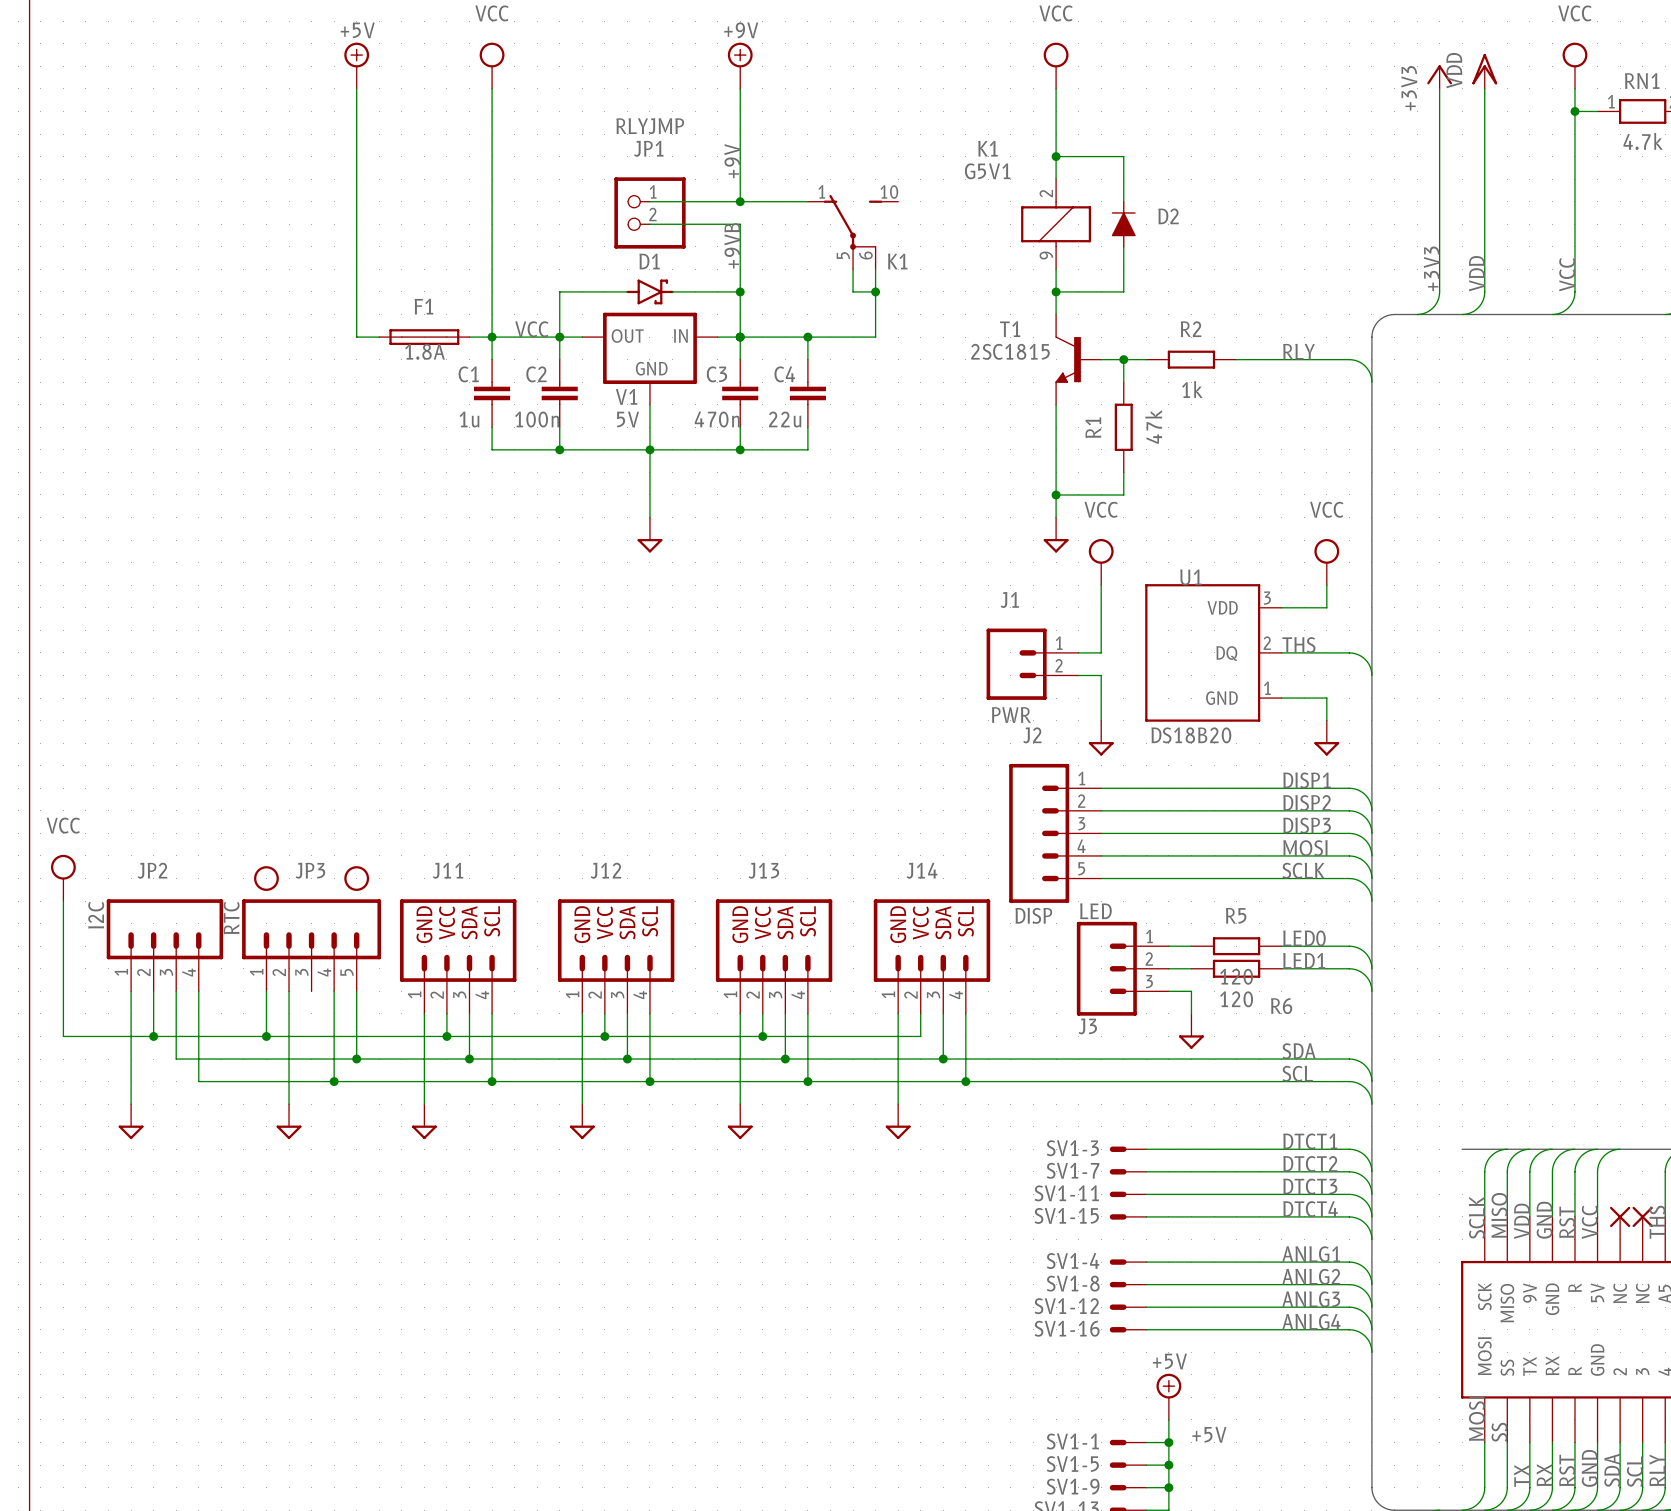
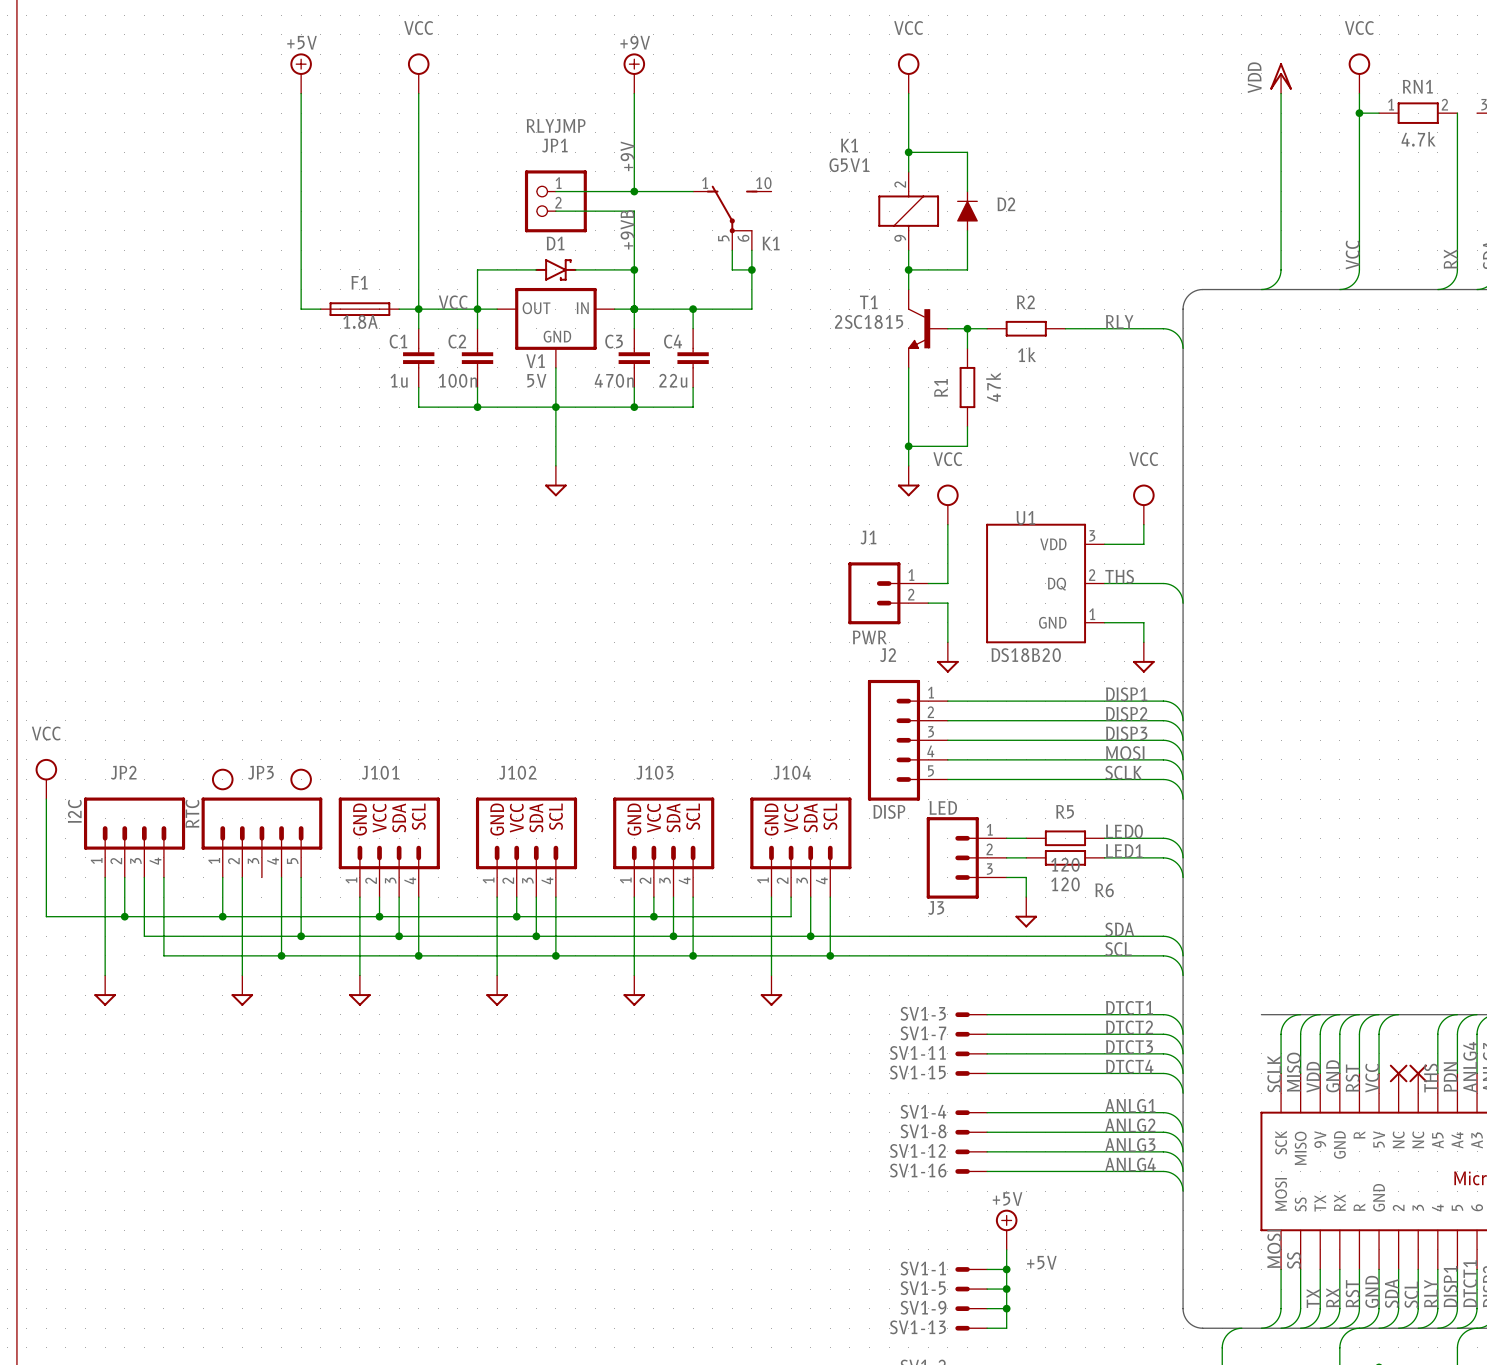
power symbol: +3V3 (1439, 77) -> none
wire: (1439, 88) (1439, 294) (1436, 303) (1430, 309) (1417, 314) -> none
label: +3V3 (1431, 268) -> none
label: VDD (1476, 273) -> none
J11 name: J11 (448, 870) -> J101 (380, 772)
J12 name: J12 (605, 870) -> J102 (517, 772)
J13 name: J13 (763, 870) -> J103 (654, 772)
J14 name: J14 (922, 870) -> J104 (792, 772)

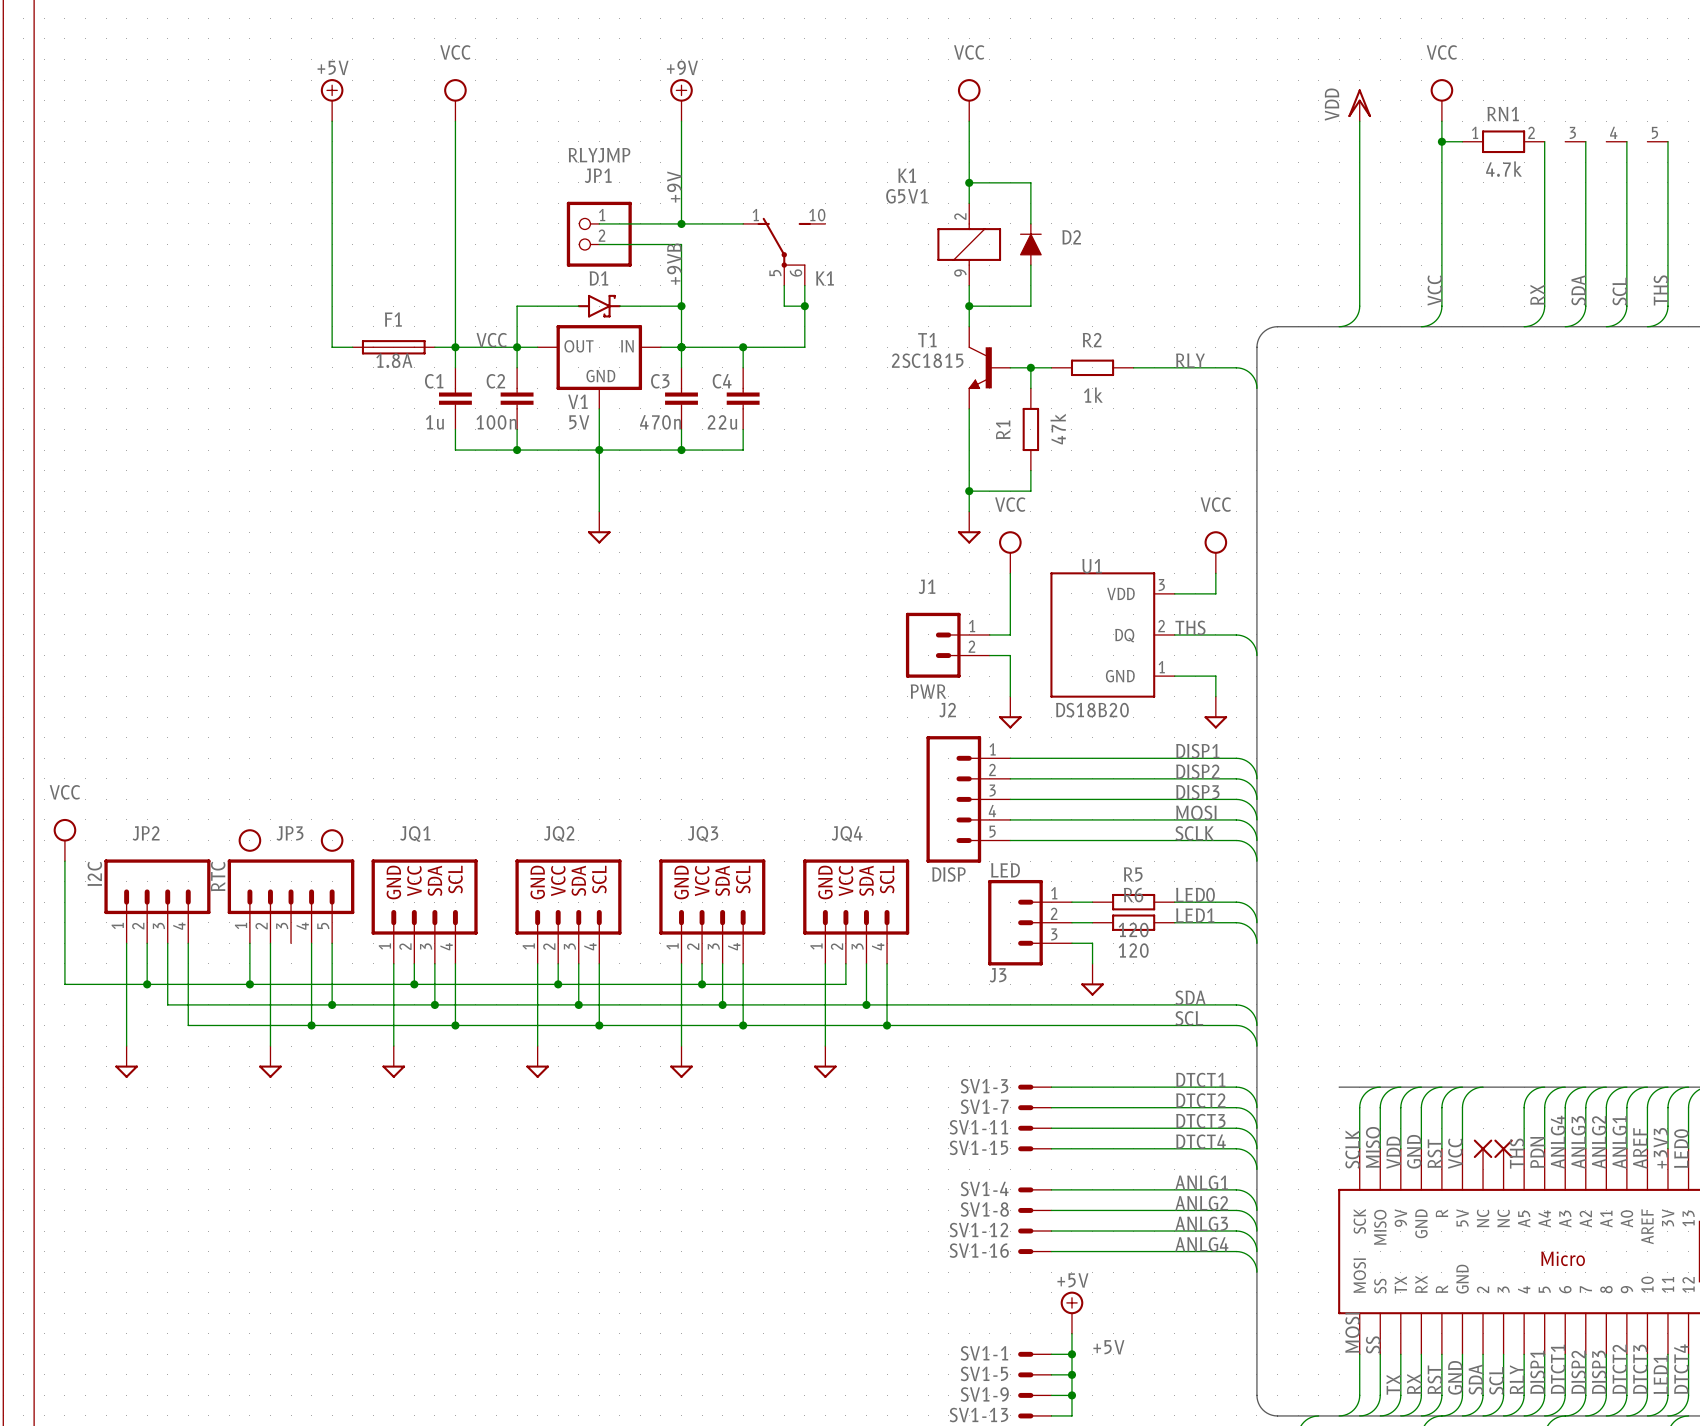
J101 name: J101 (380, 772) -> JQ1 (415, 834)
J102 name: J102 (517, 772) -> JQ2 (559, 834)
J103 name: J103 (654, 772) -> JQ3 (703, 834)
J104 name: J104 (792, 772) -> JQ4 (847, 834)
R6 name position: R6 (1104, 890) -> R6 (1133, 895)

